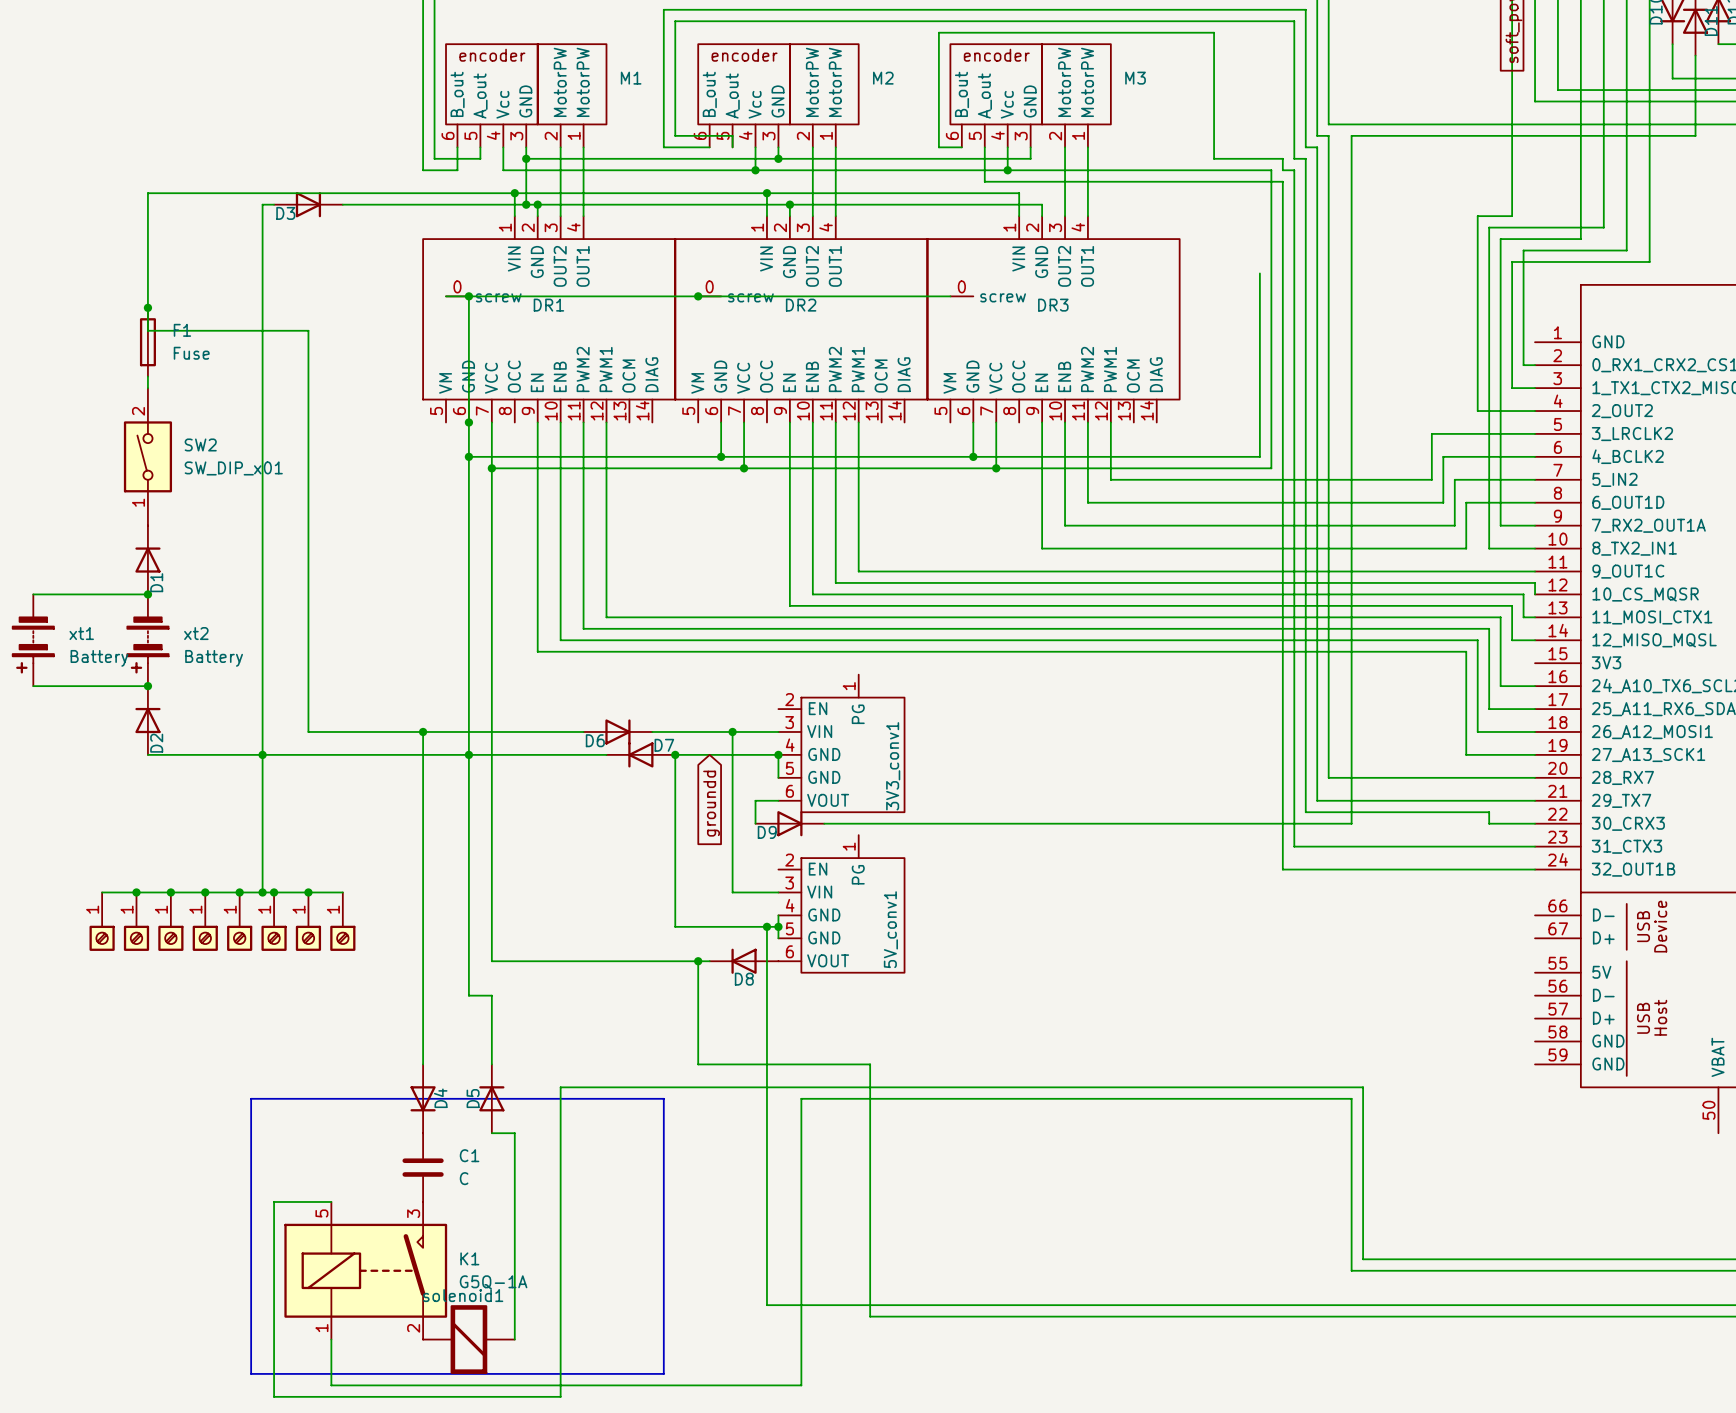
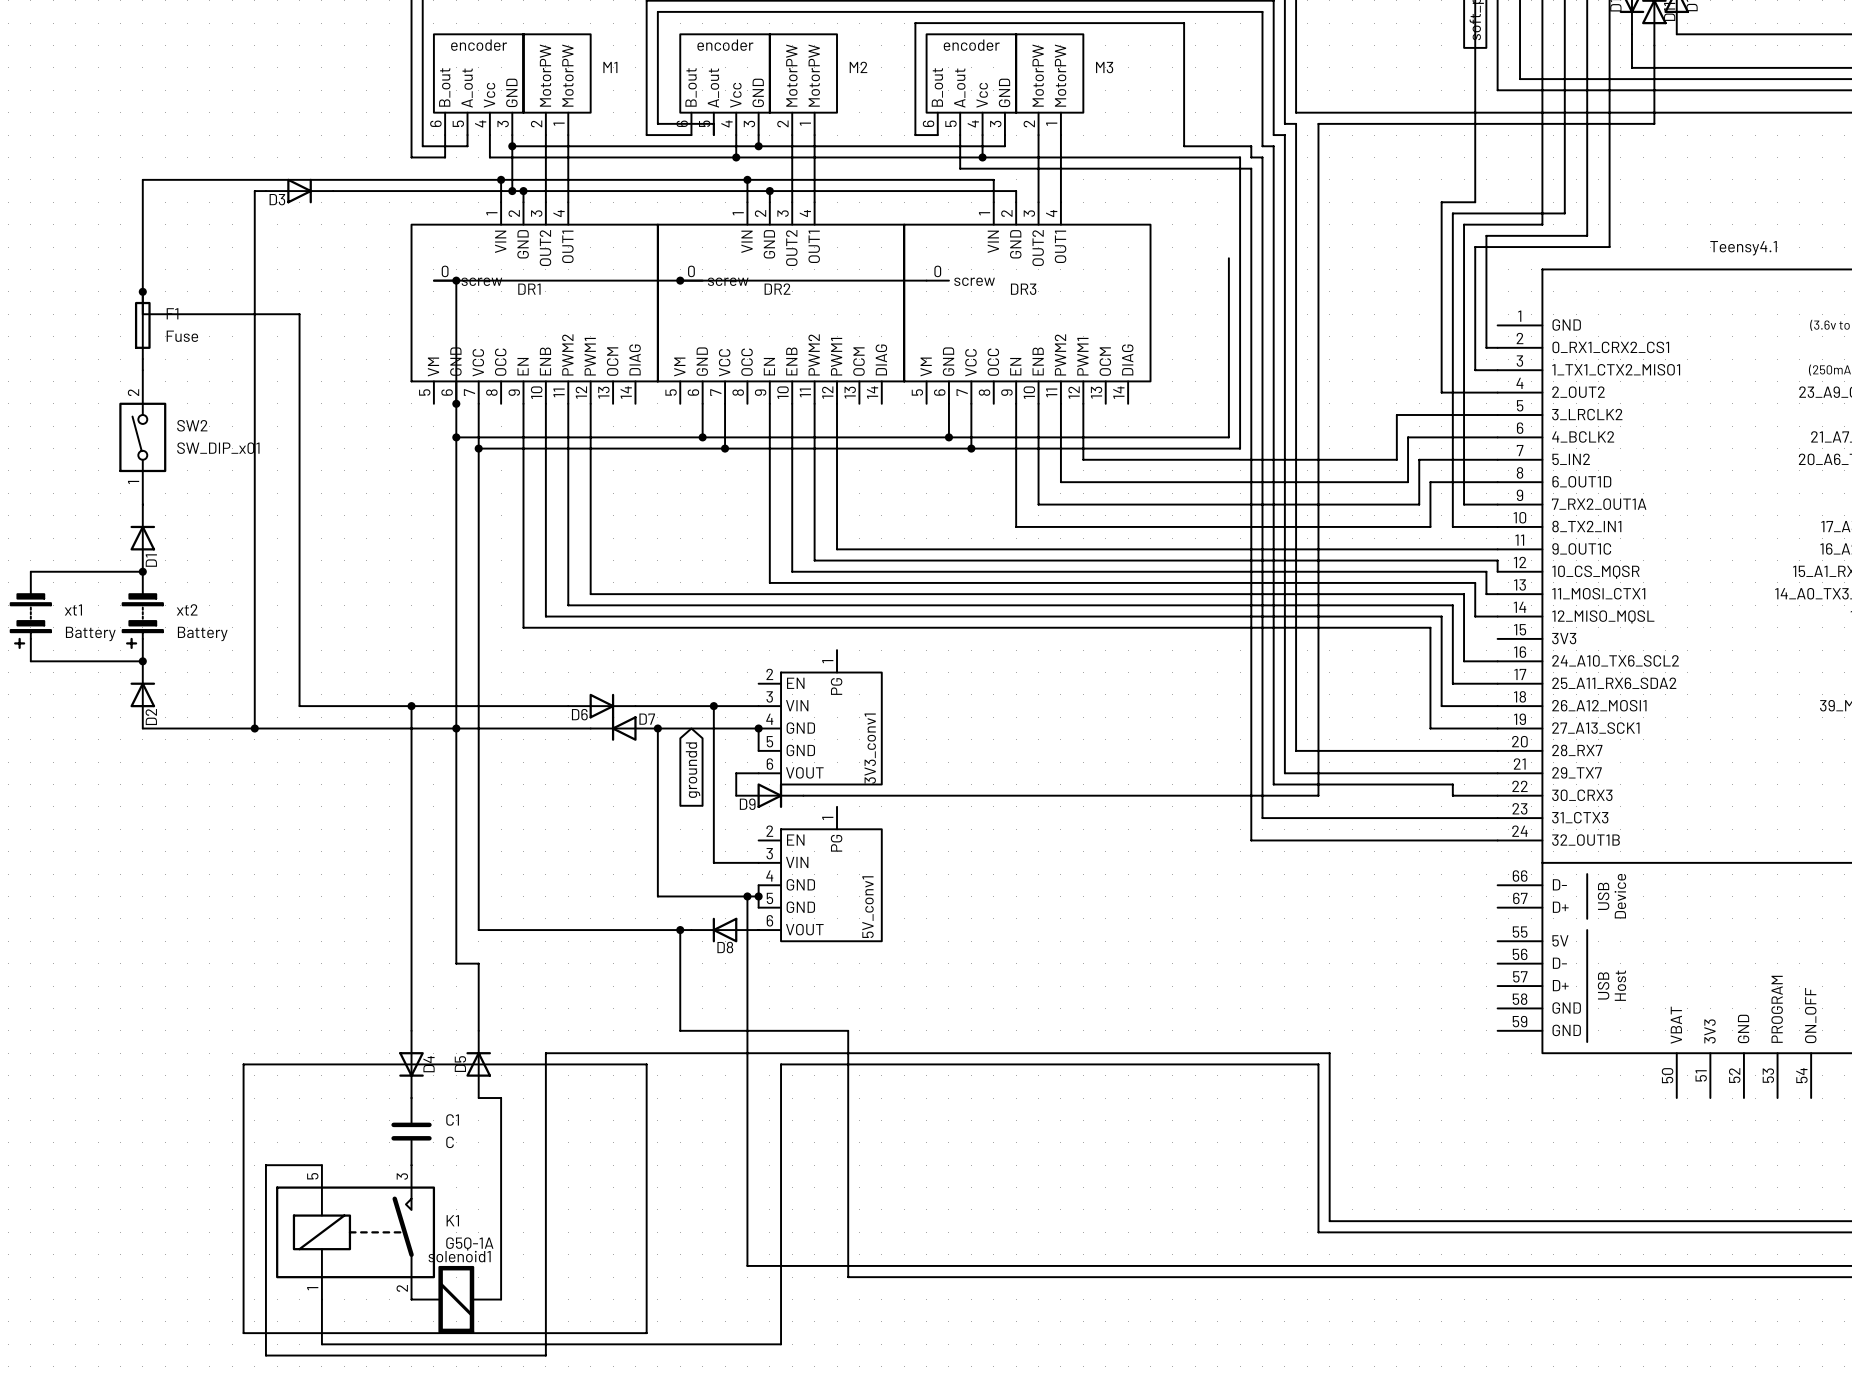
wire: (262, 754) (262, 892) -> none
wire: (102, 892) (342, 892) -> none
junction: (136, 892) -> none
junction: (170, 892) -> none
junction: (205, 892) -> none
junction: (239, 892) -> none
junction: (262, 892) -> none
junction: (274, 892) -> none
junction: (308, 892) -> none
part: (102, 921) -> none
part: (136, 921) -> none
part: (170, 921) -> none
part: (205, 921) -> none
part: (239, 921) -> none
part: (274, 921) -> none
part: (308, 921) -> none
part: (342, 921) -> none

